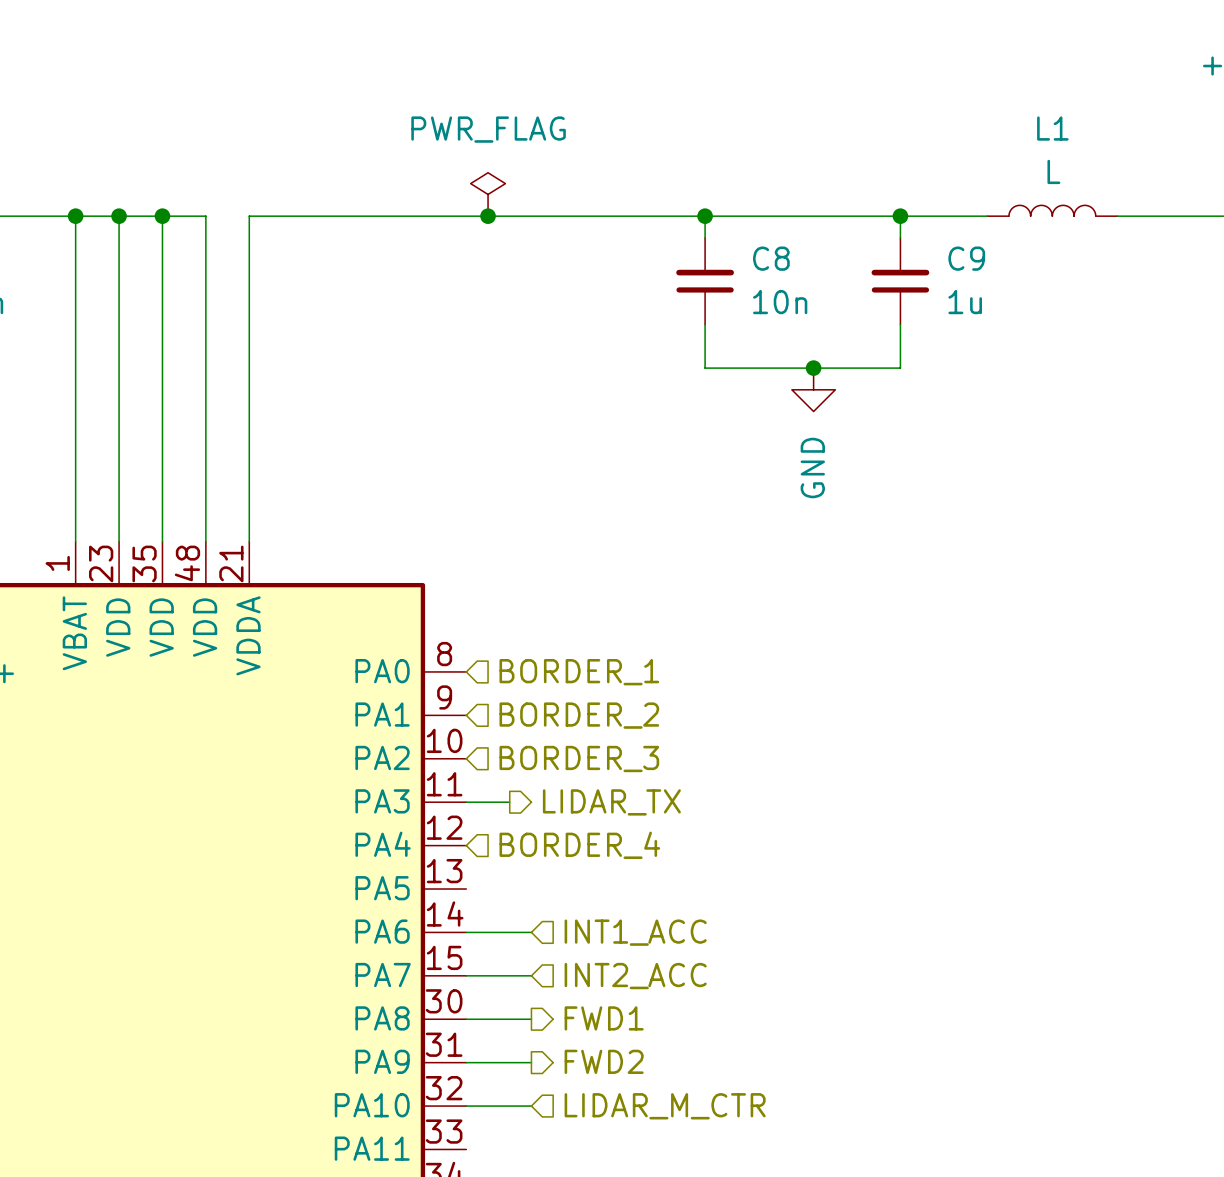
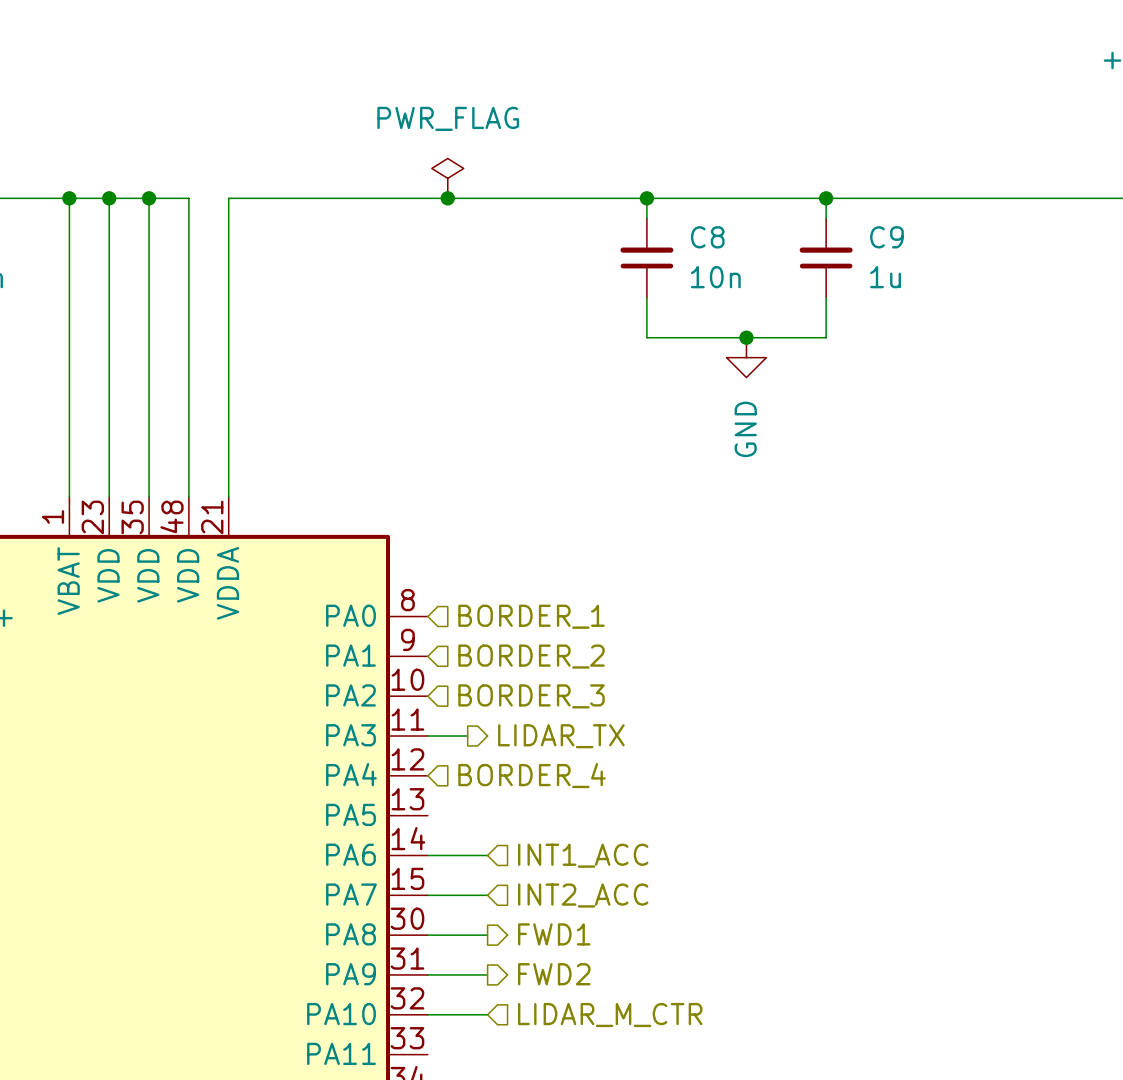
L1: L (1052, 210) -> none
wire: none -> (905, 198) (1025, 198)

